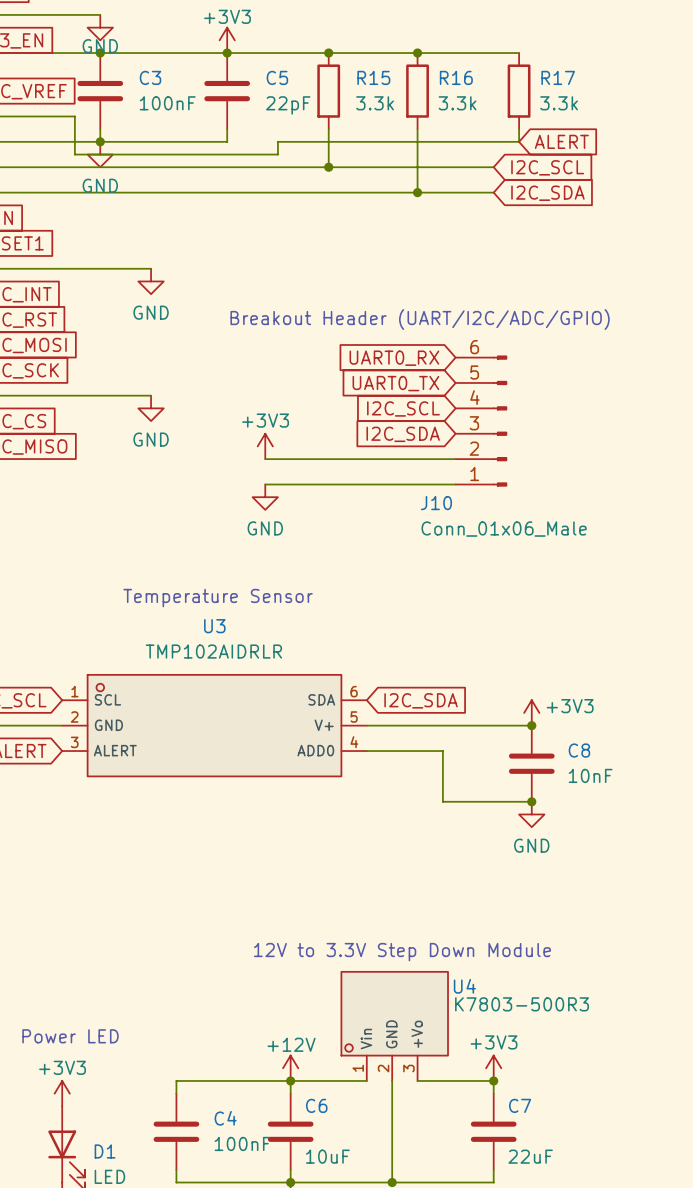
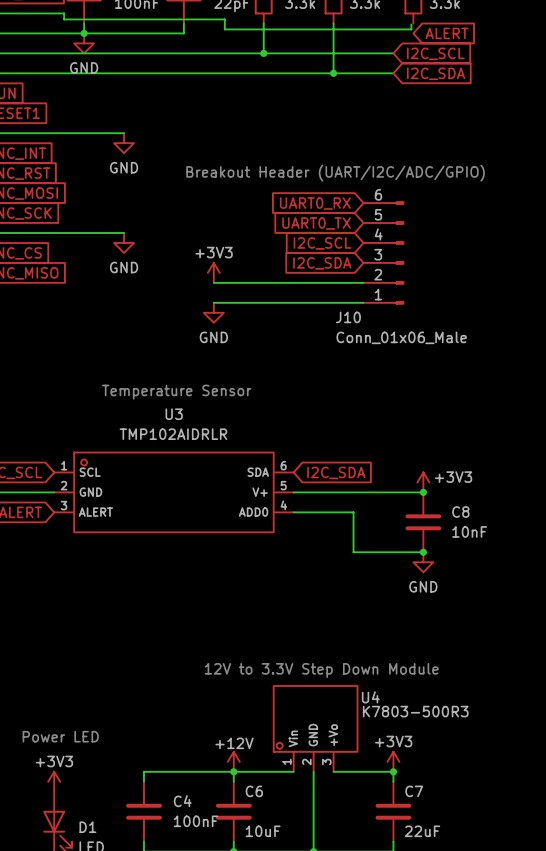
wire: (74, 124) (74, 154) (277, 154) (277, 141) (519, 141) (519, 129) -> (64, 19) (224, 19) (224, 29) (411, 29) (411, 24)

